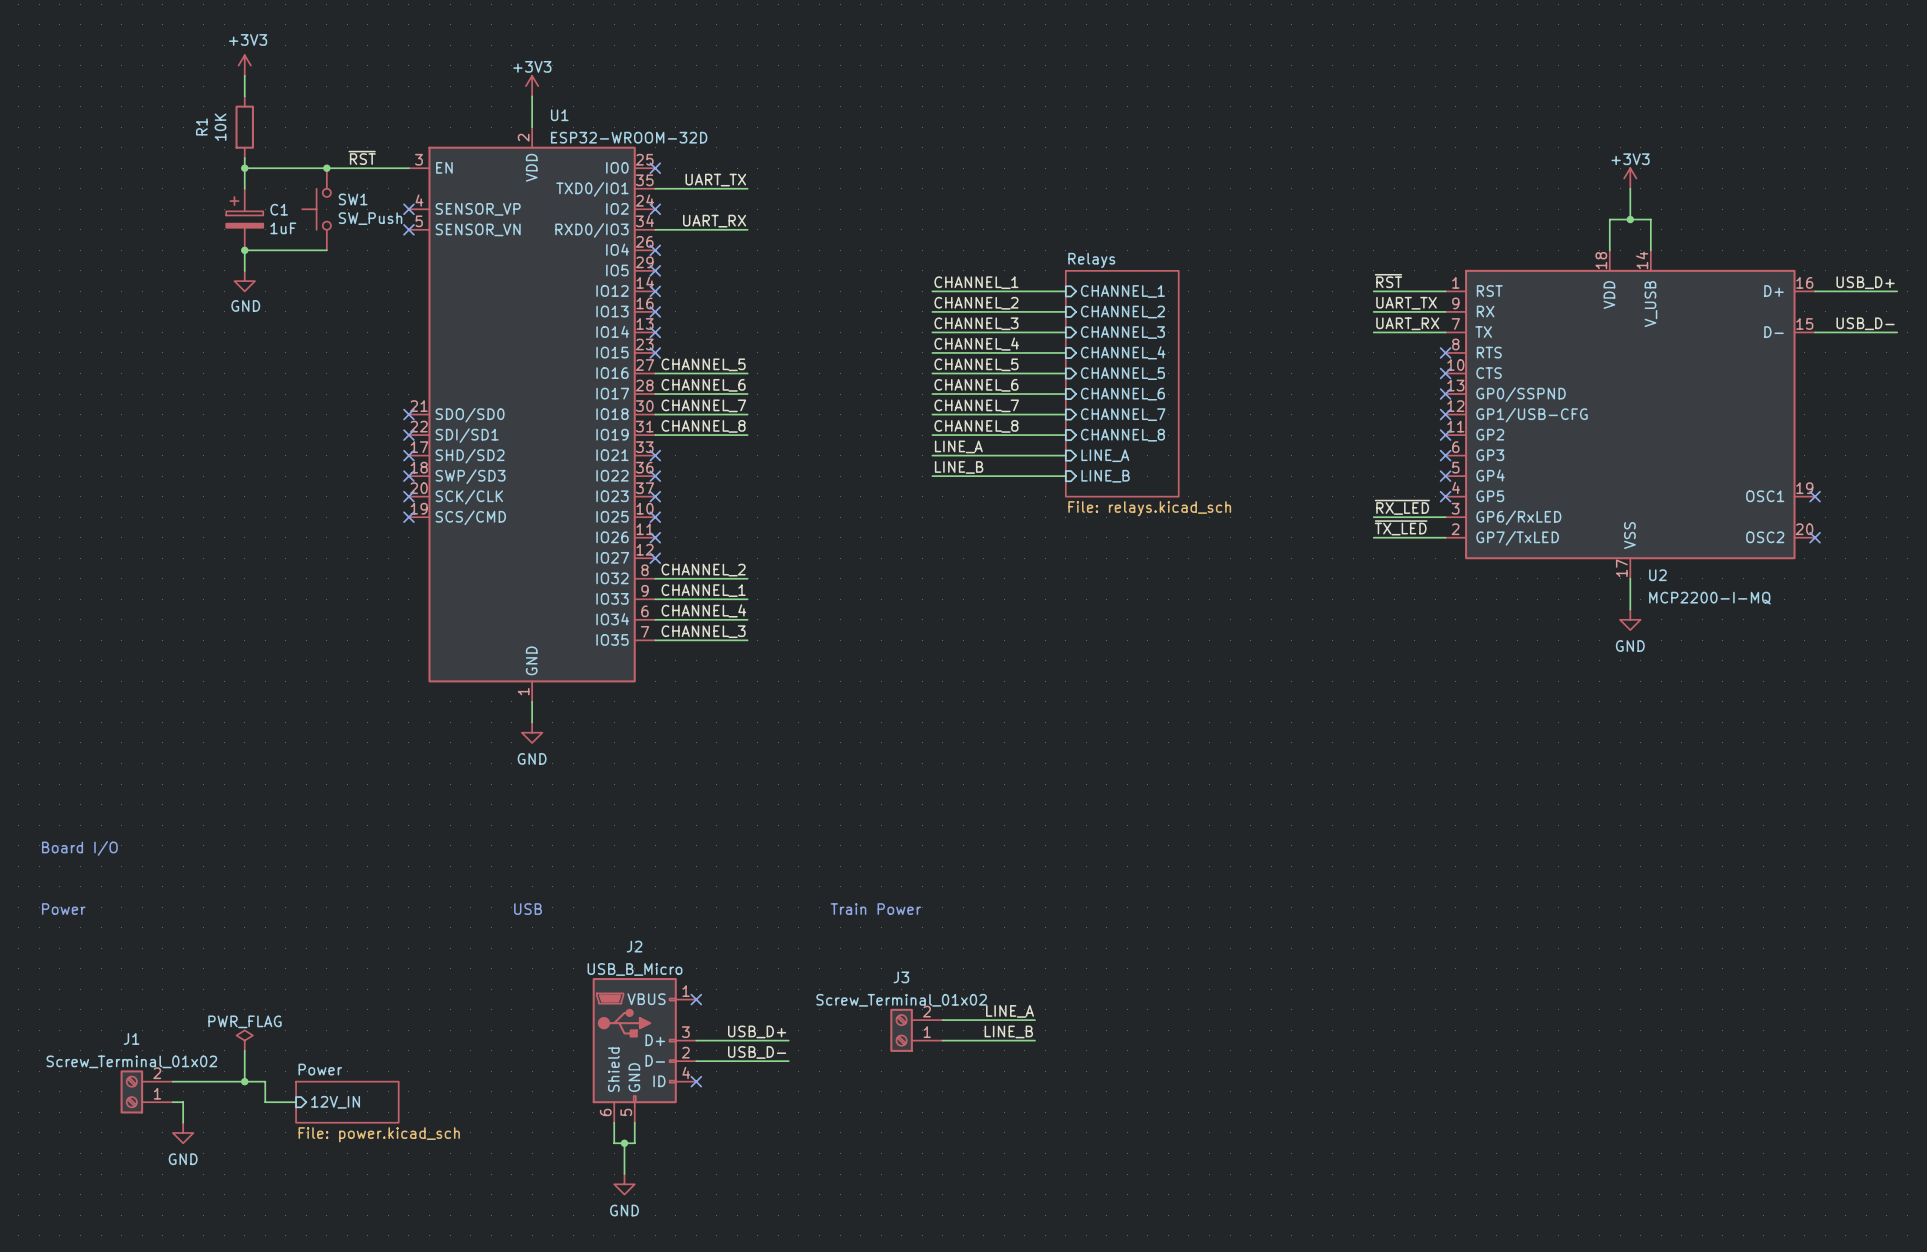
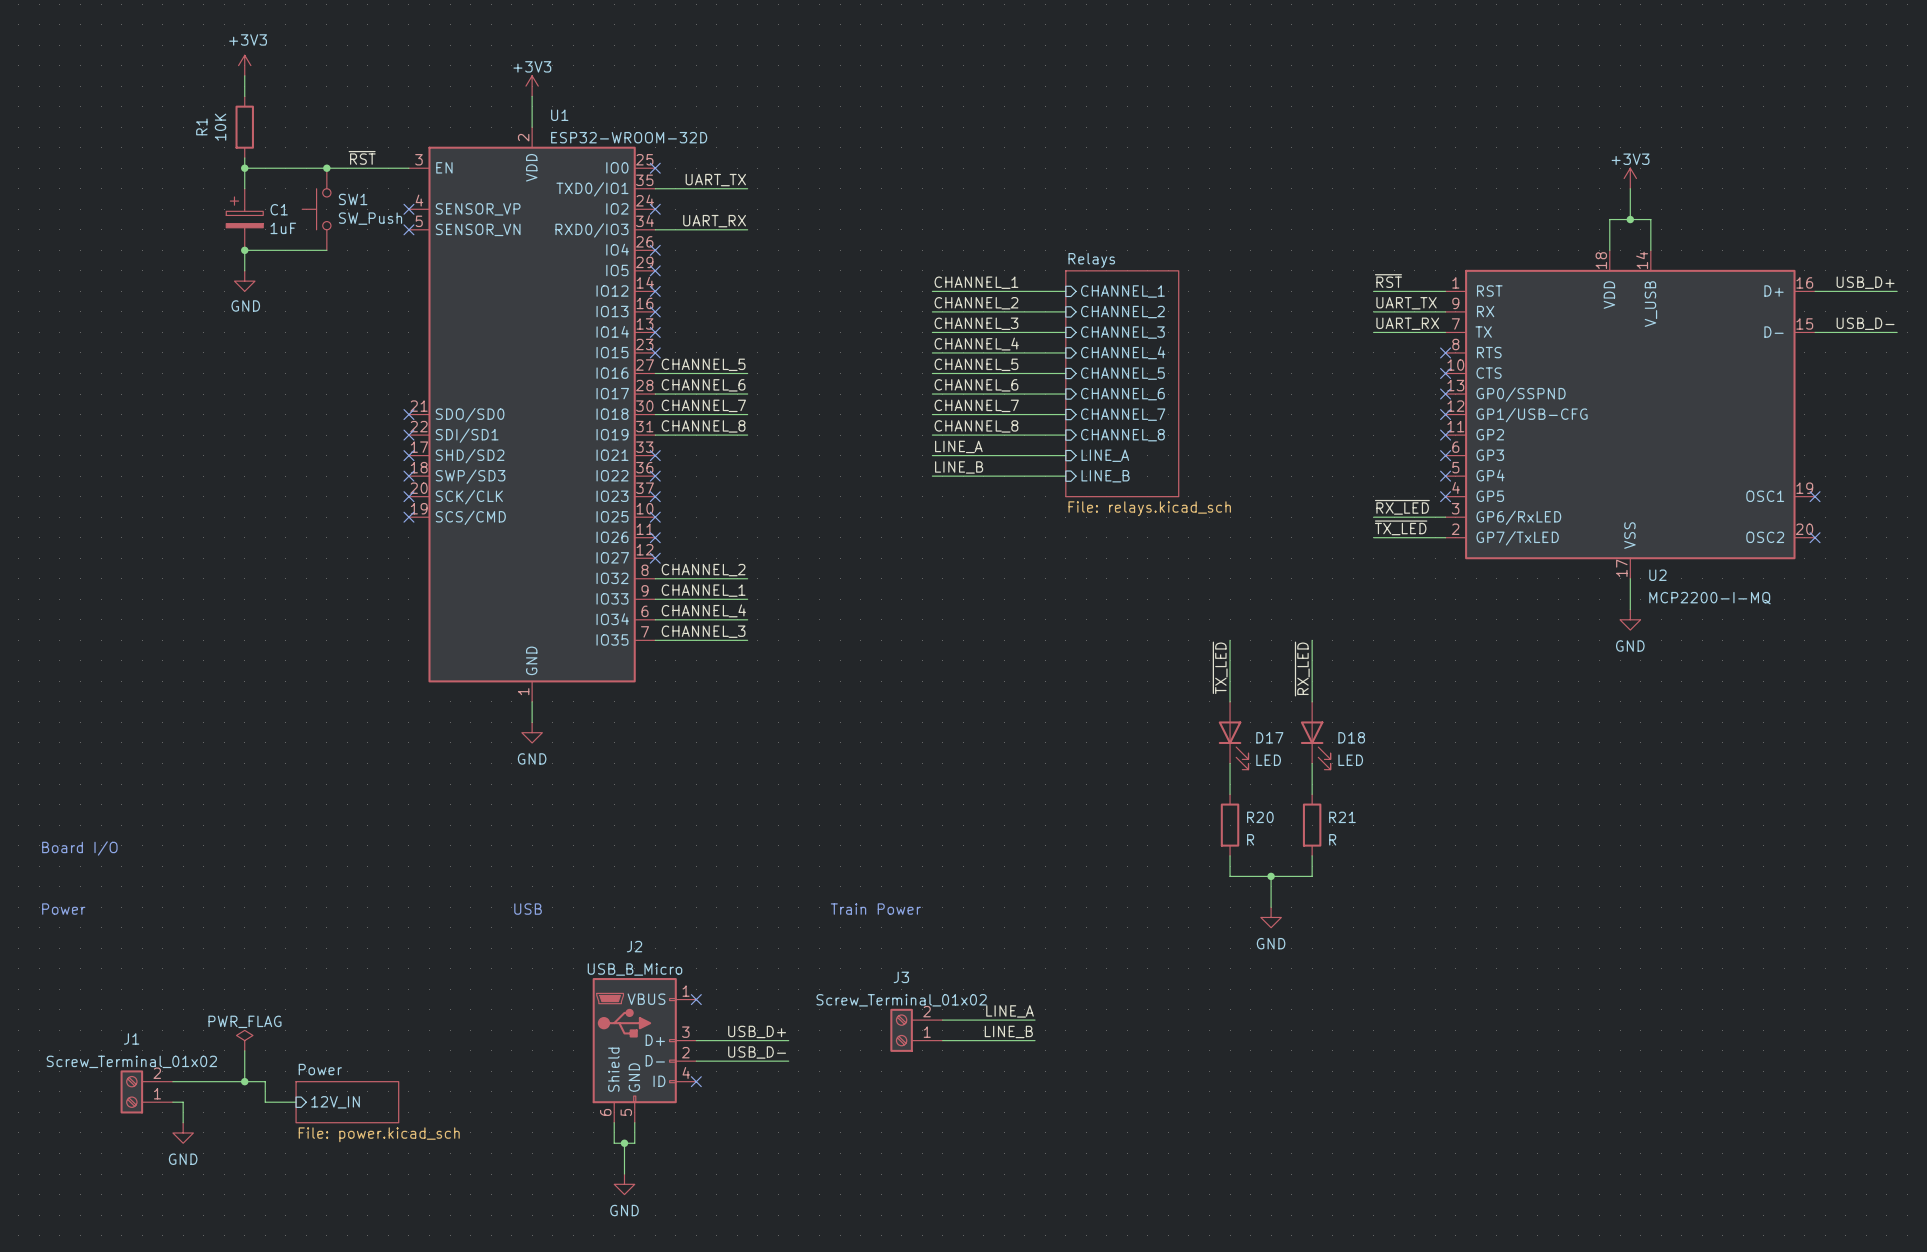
wire: none -> (1230, 640) (1230, 701)
wire: none -> (1312, 640) (1312, 701)
label: none -> ~{TX_LED} (1220, 667)
label: none -> ~{RX_LED} (1302, 669)
D17: none -> LED (1233, 735)
D18: none -> LED (1315, 735)
wire: none -> (1230, 763) (1230, 794)
wire: none -> (1312, 763) (1312, 794)
R20: none -> R (1230, 825)
R21: none -> R (1312, 825)
wire: none -> (1230, 855) (1230, 876) (1312, 876) (1312, 855)
wire: none -> (1271, 876) (1271, 907)
junction: none -> (1271, 876)
power symbol: none -> GND (1271, 917)

